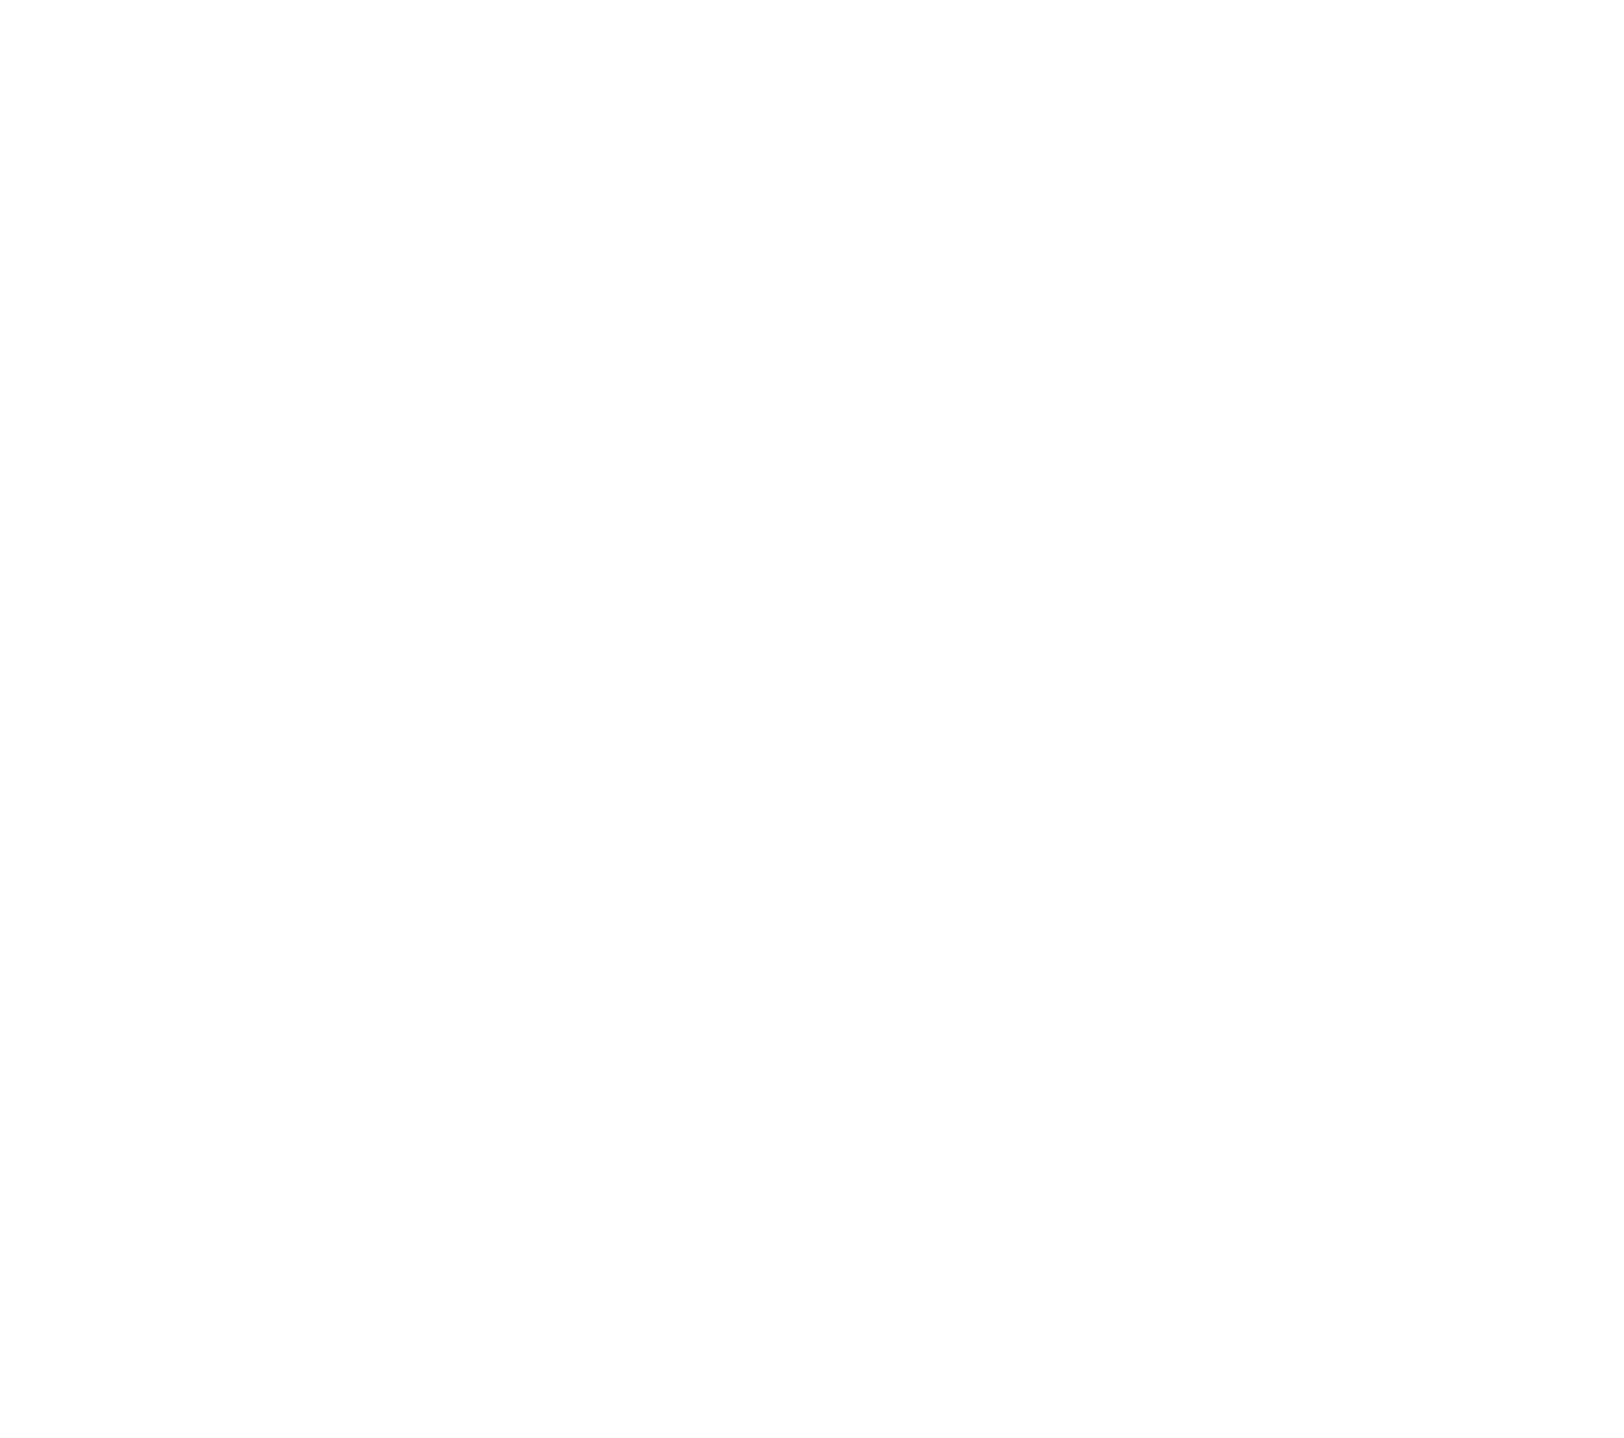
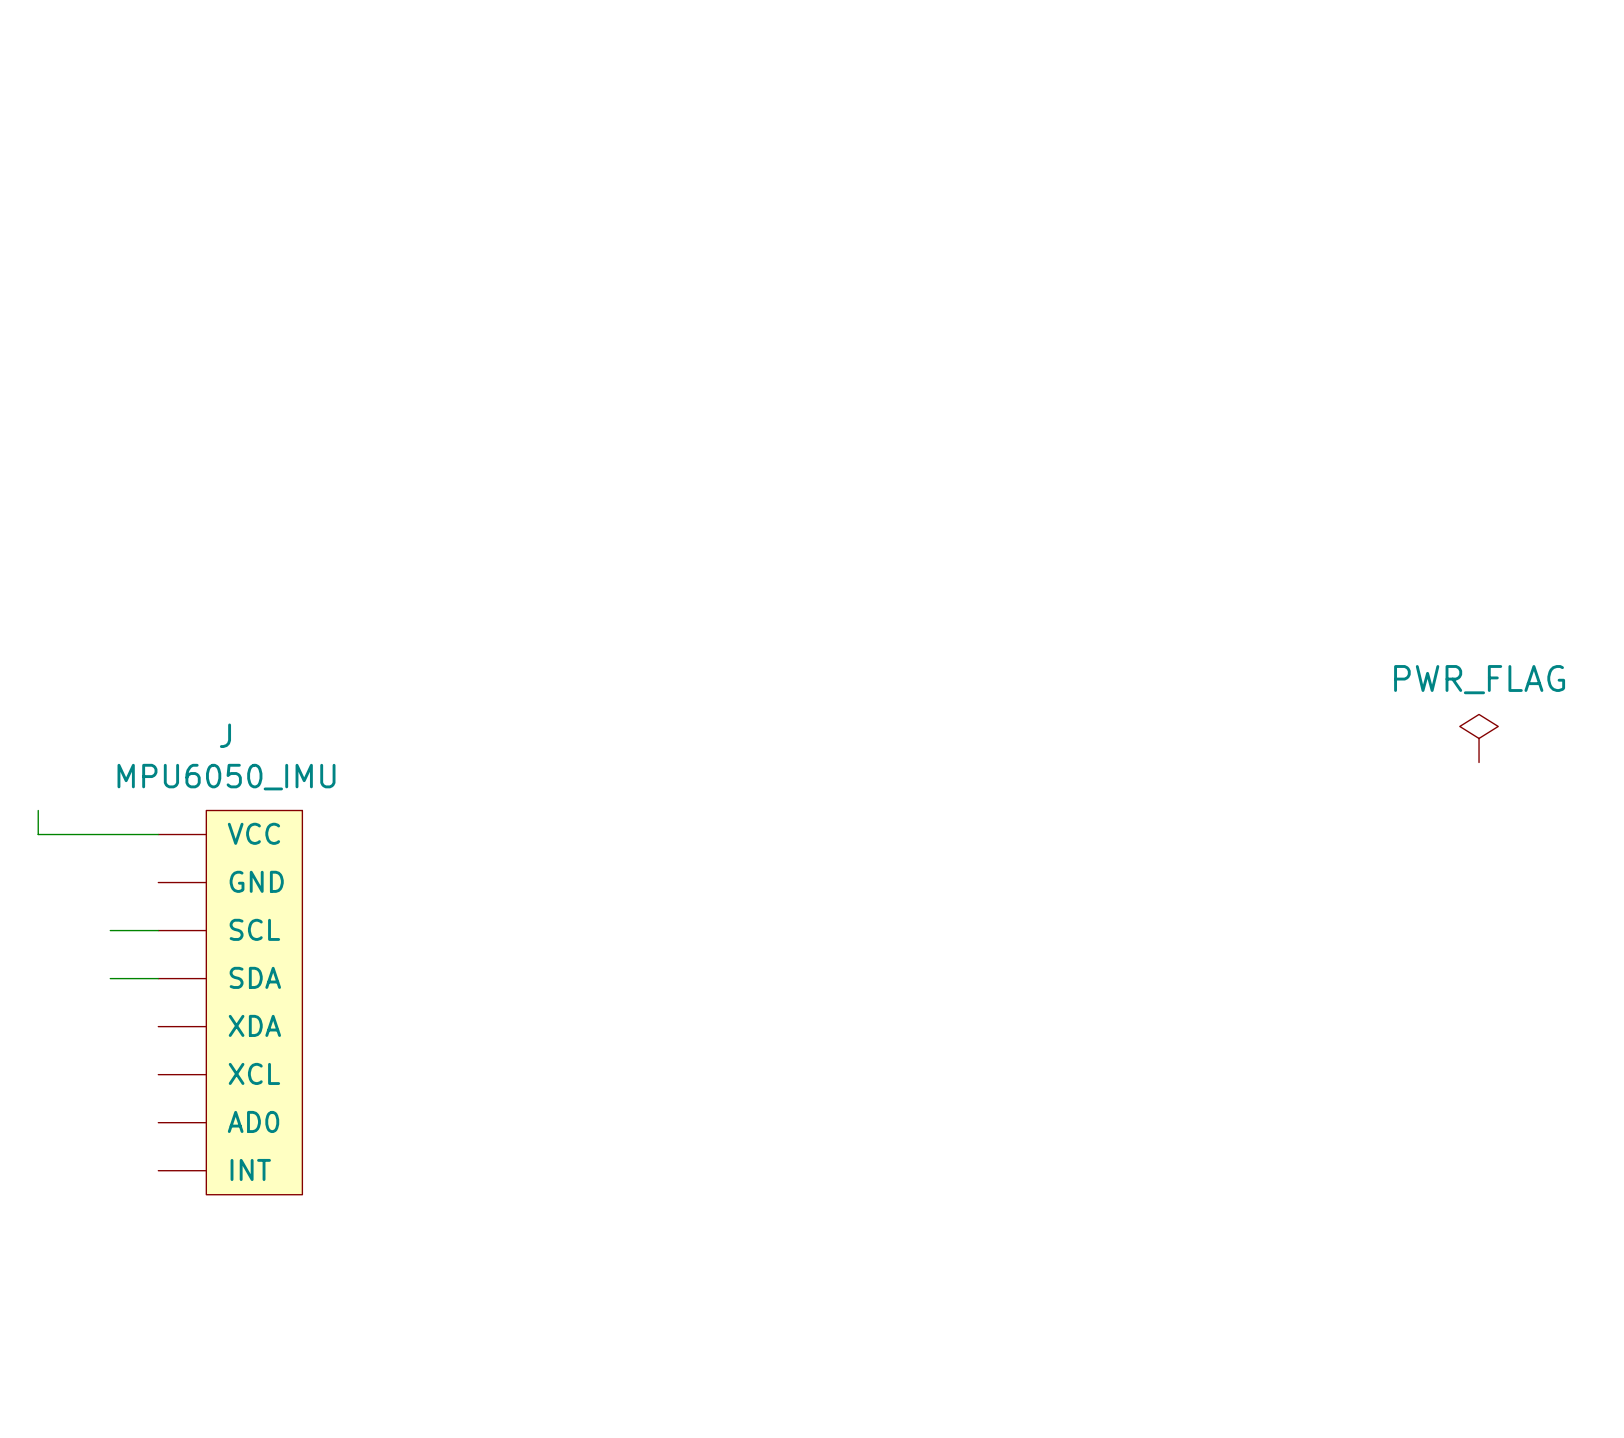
power symbol: none -> PWR_FLAG (1479, 738)
wire: none -> (38, 810) (38, 834) (158, 834)
wire: none -> (110, 930) (158, 930)
wire: none -> (110, 978) (158, 978)
J: none -> MPU6050_IMU (230, 1002)

